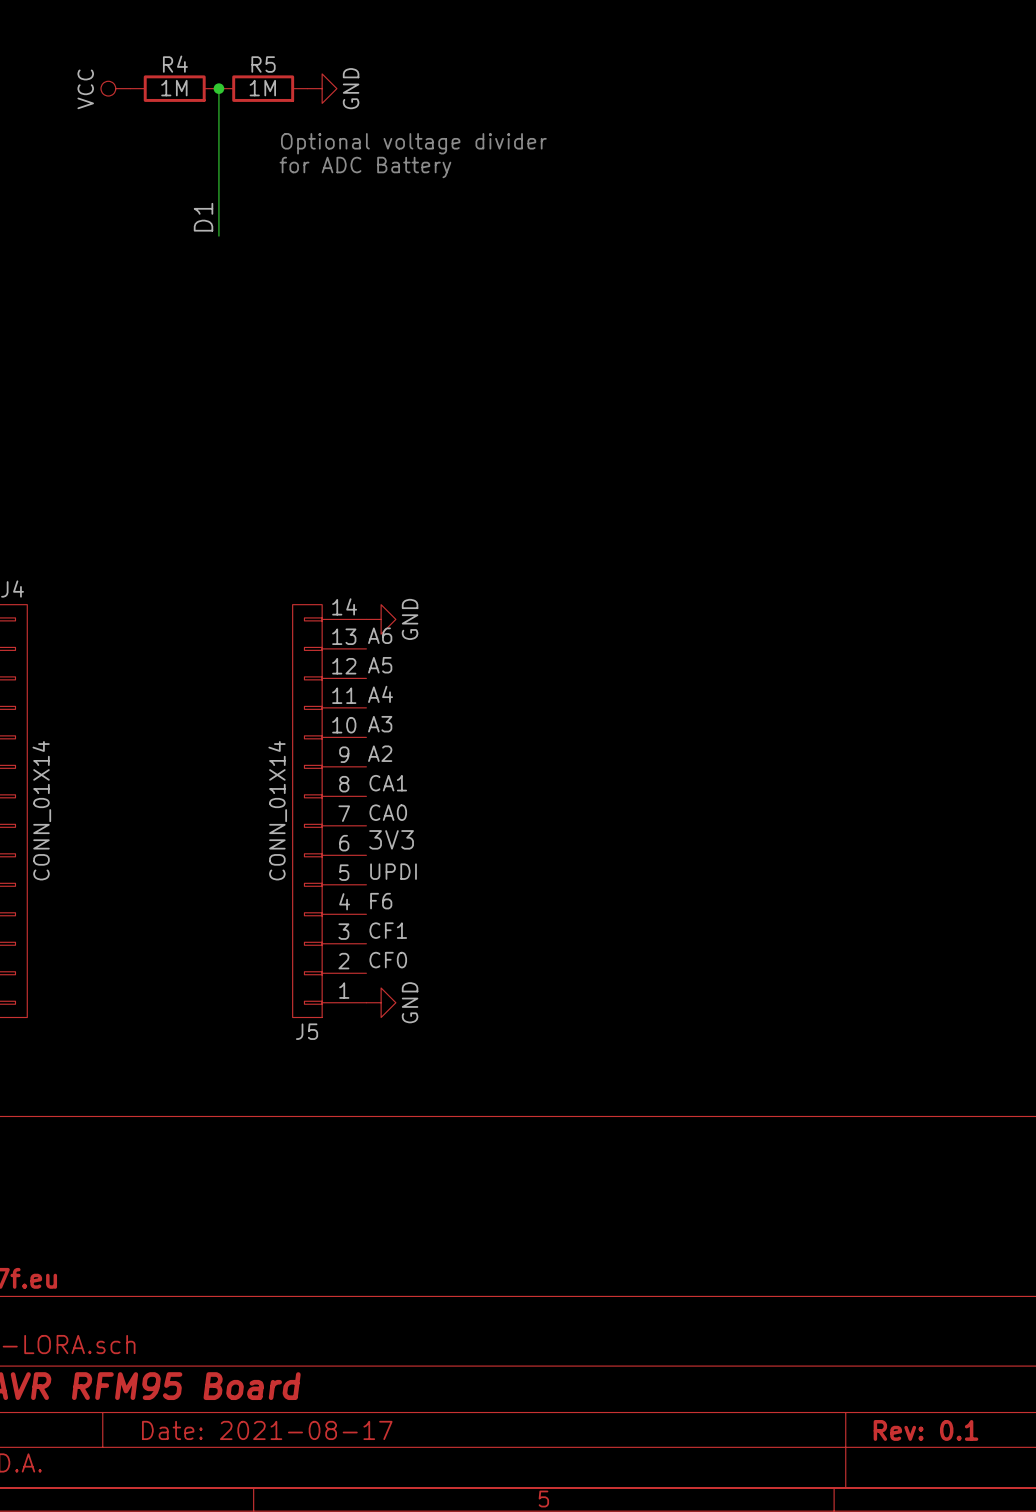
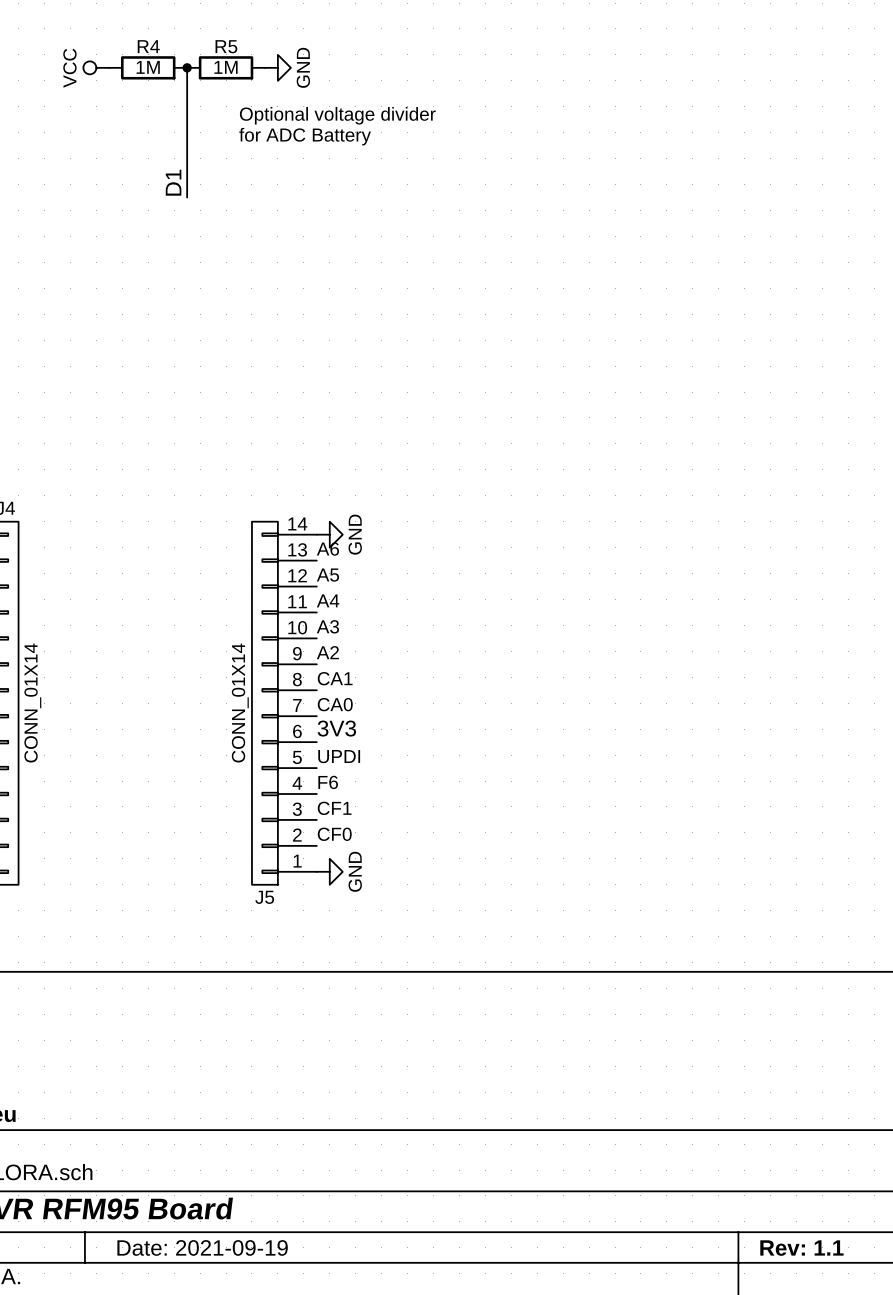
title block: Date: 2021-08-17 (267, 1430) -> Date: 2021-09-19 (202, 1247)
title block: Rev: 0.1 (925, 1430) -> Rev: 1.1 (801, 1248)

